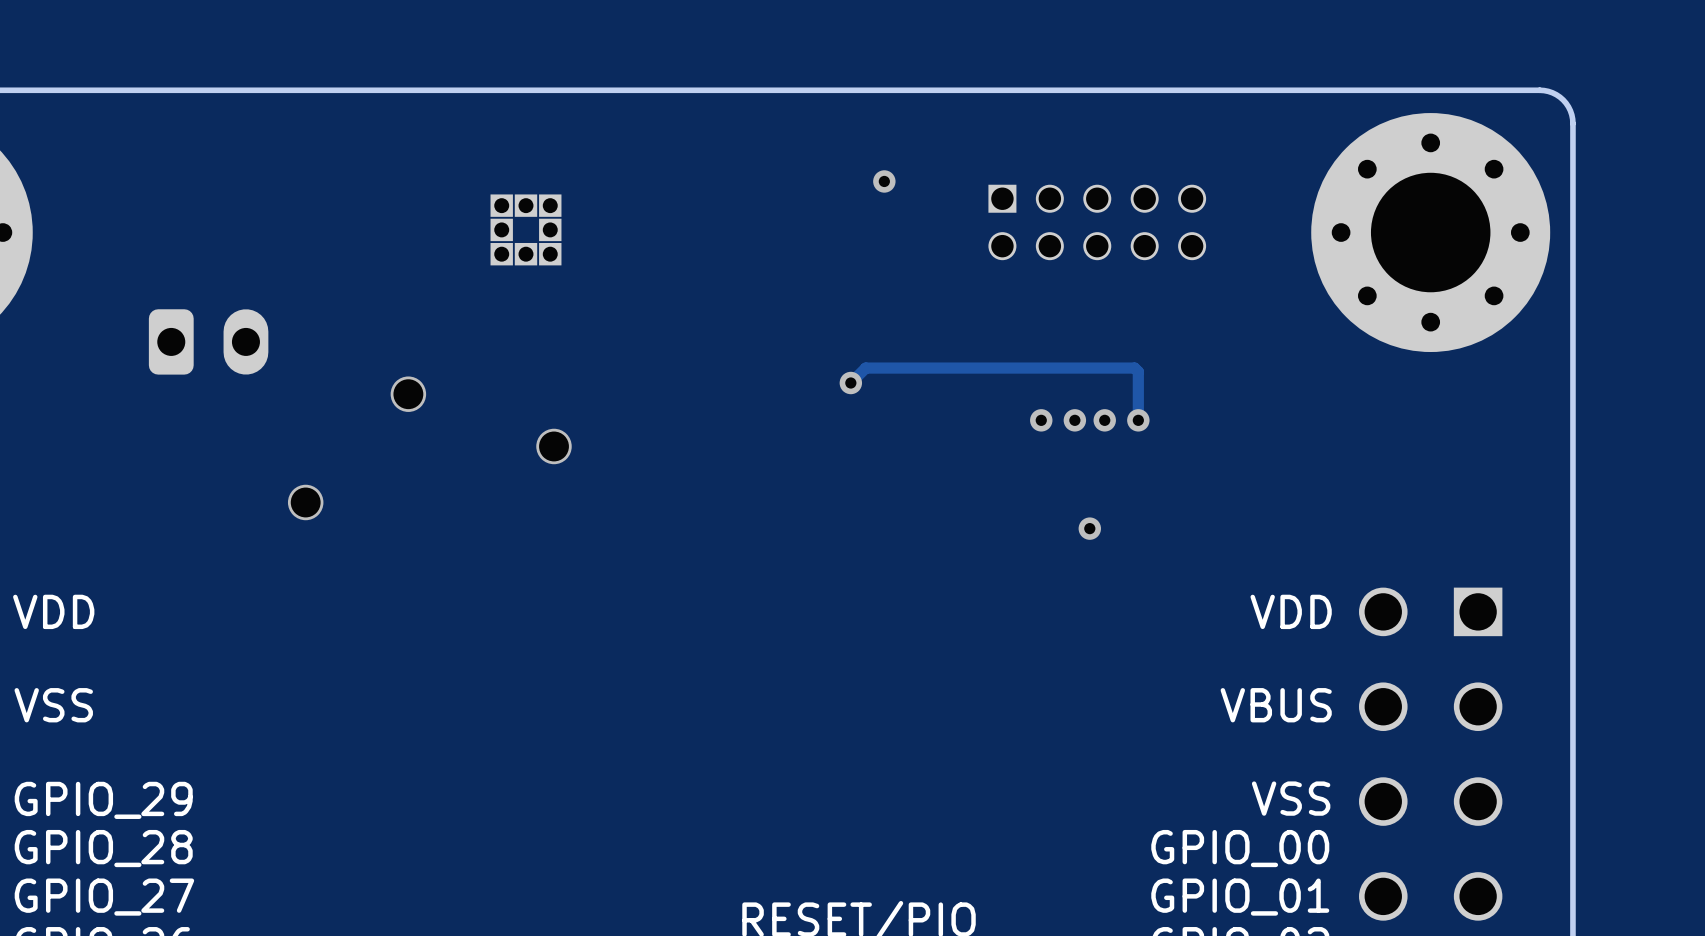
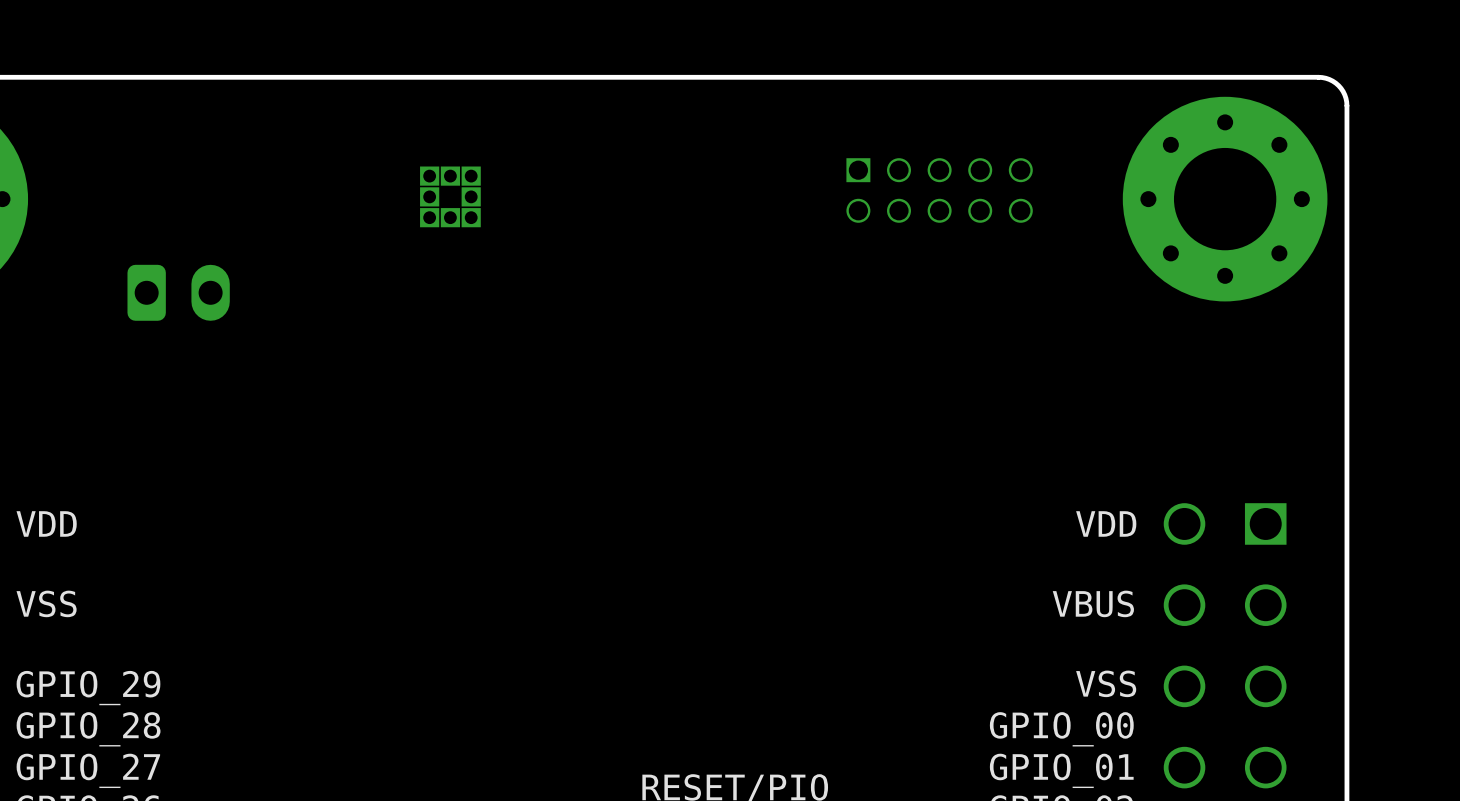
via: (884, 181) -> none
track: (850, 383) (865, 368) (1134, 368) (1138, 371) (1138, 420) -> none
via: (850, 383) -> none
via: (408, 394) -> none
via: (1041, 420) -> none
via: (1074, 420) -> none
via: (1104, 420) -> none
via: (1138, 420) -> none
via: (553, 446) -> none
via: (305, 502) -> none
via: (1089, 528) -> none

